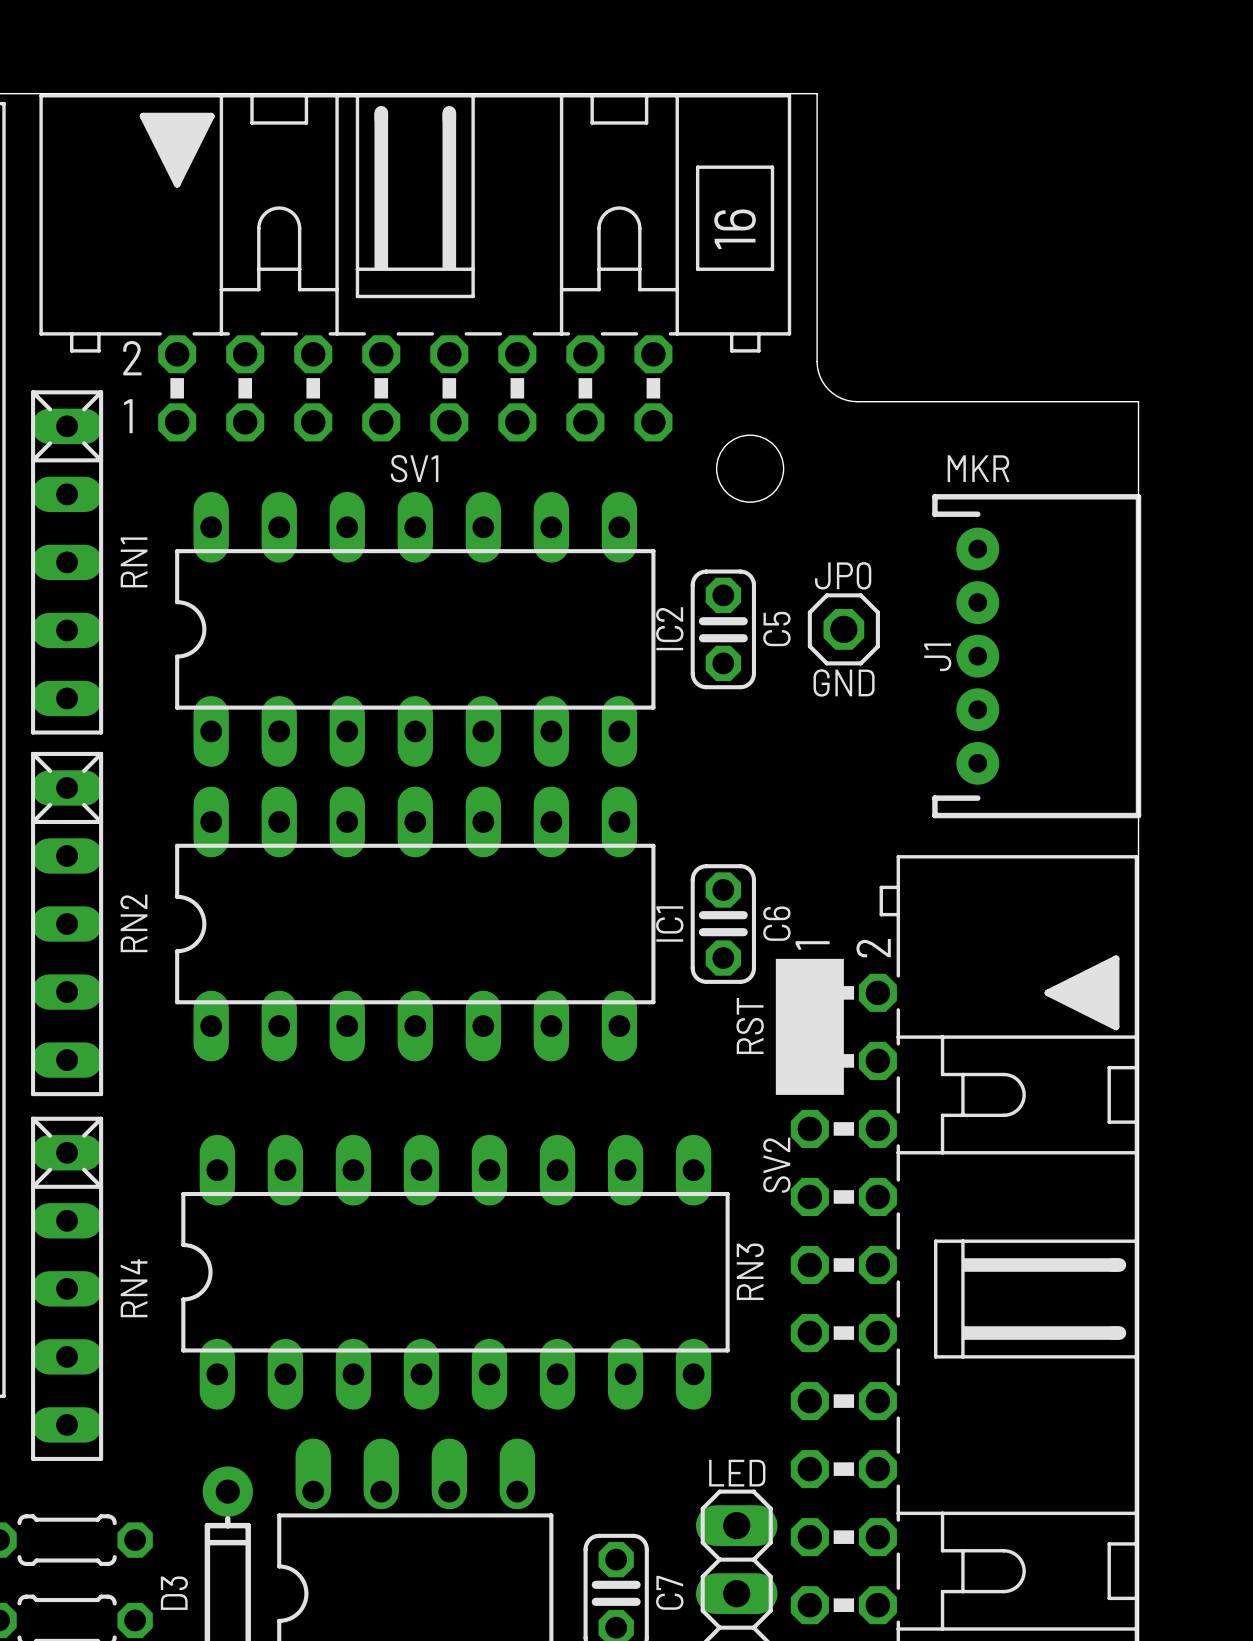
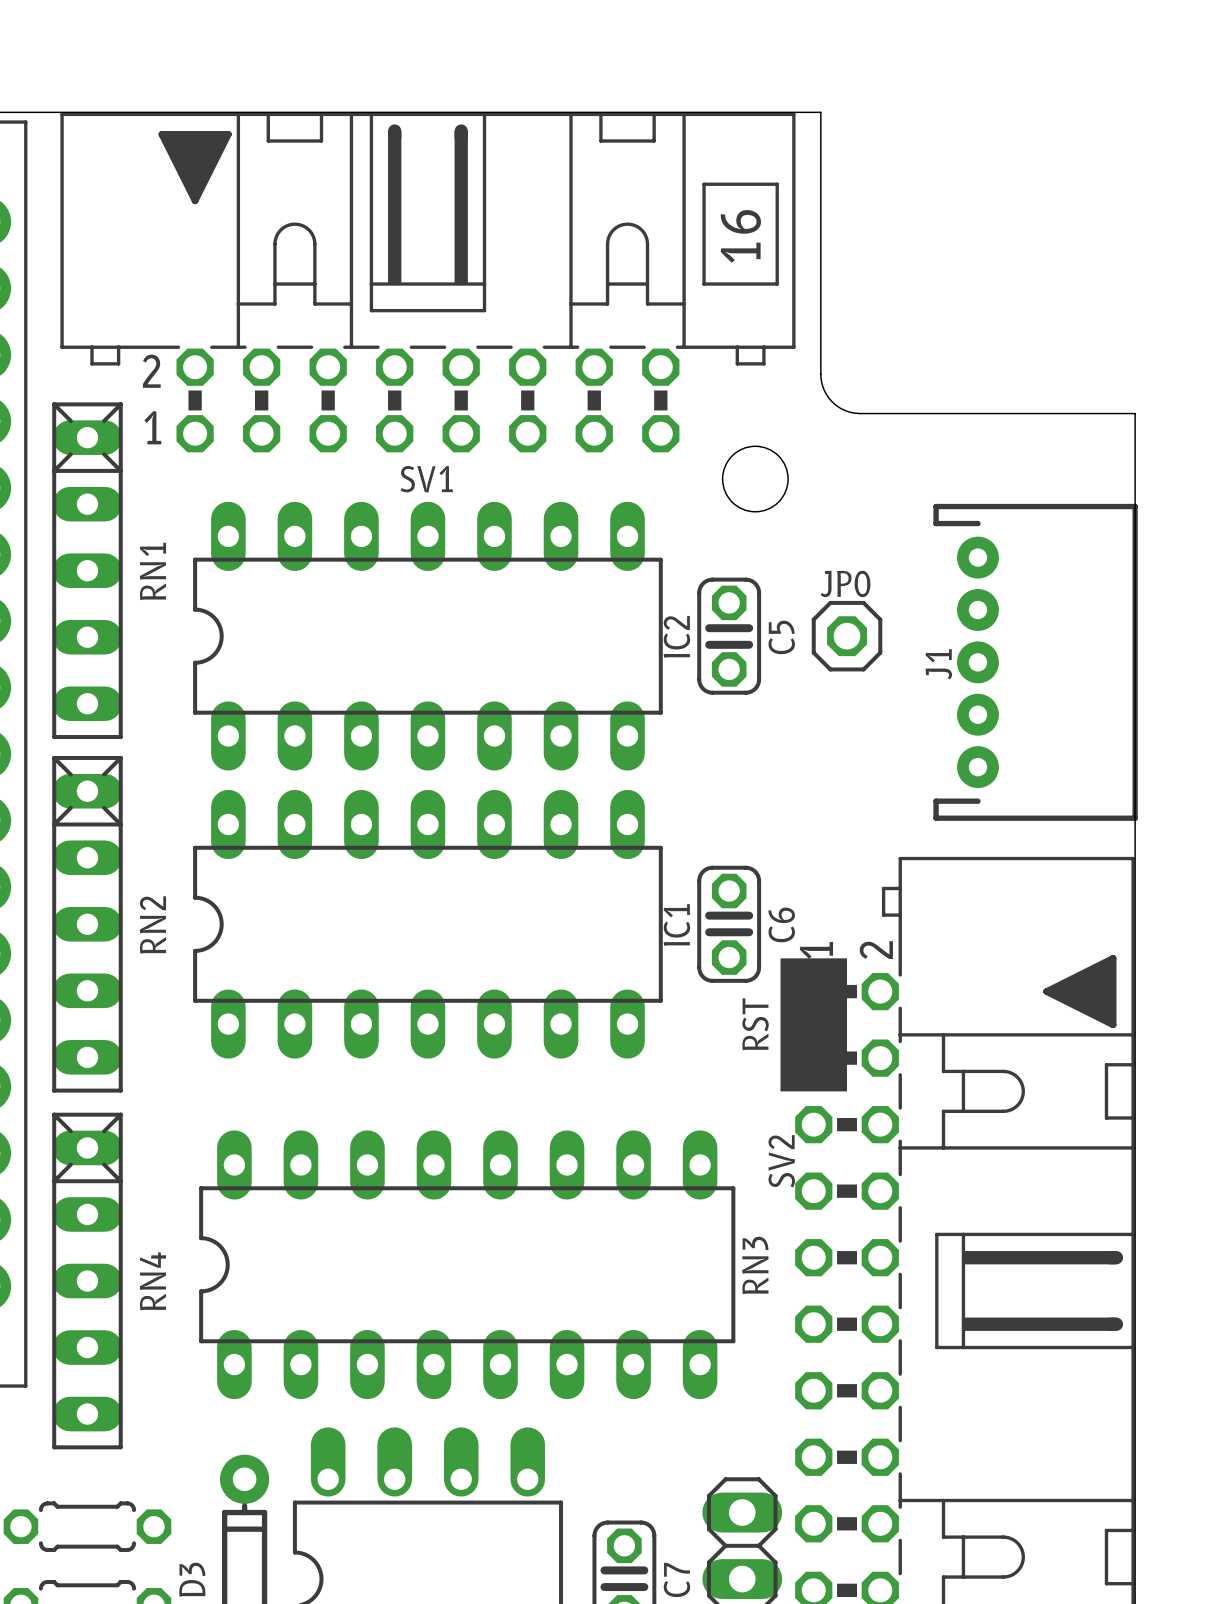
text: MKR (978, 468) -> none
text: GND (844, 682) -> none
text: LED (737, 1473) -> none

